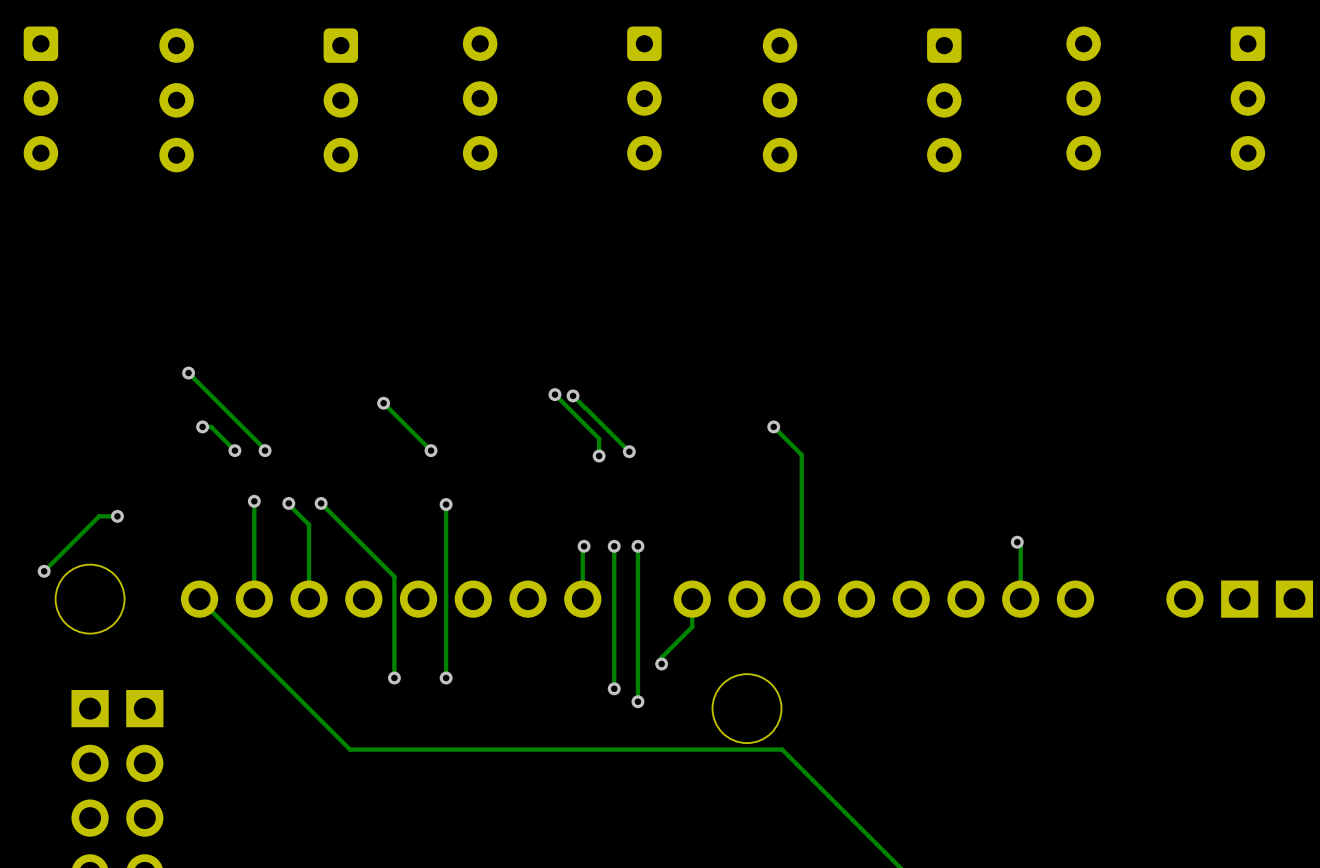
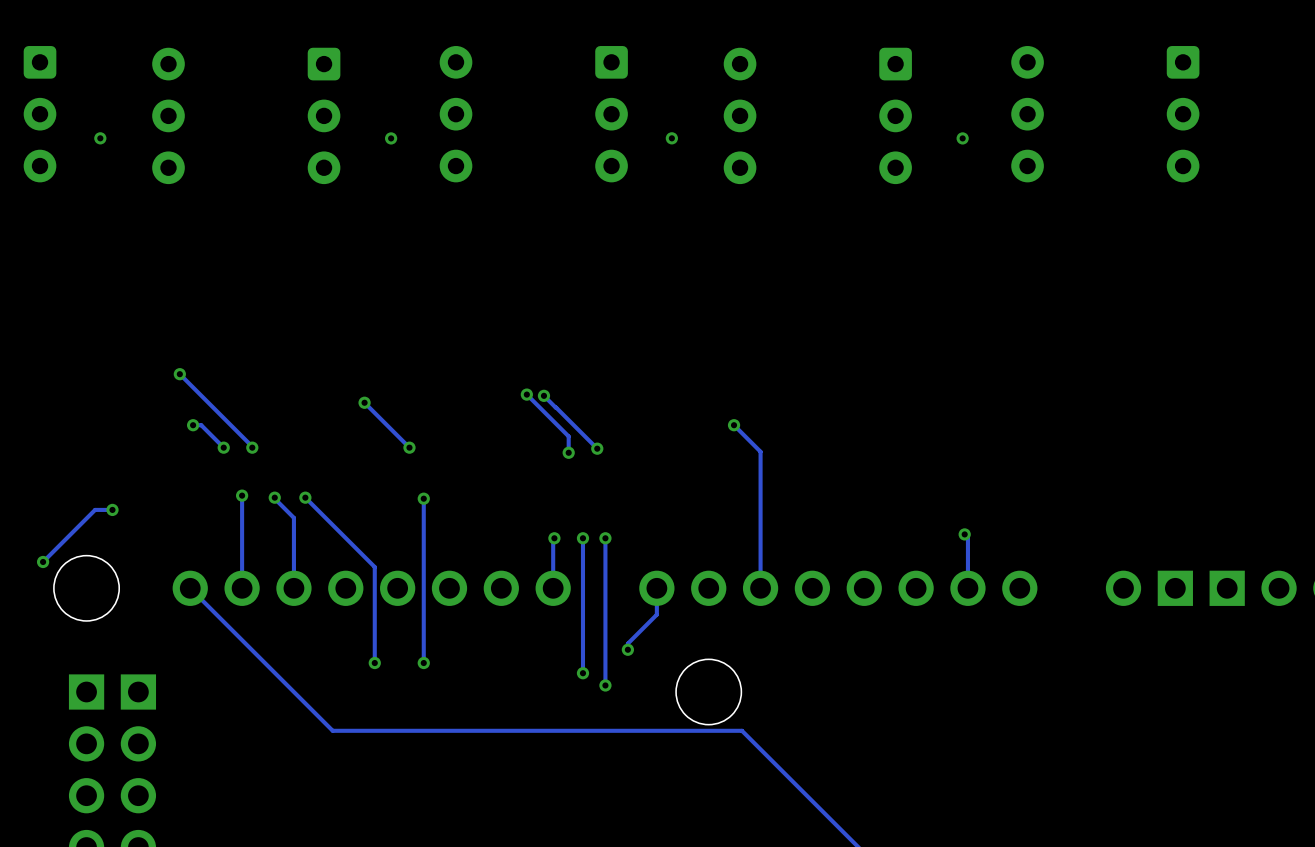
via: none -> (100, 138)
via: none -> (391, 138)
via: none -> (671, 138)
via: none -> (962, 138)

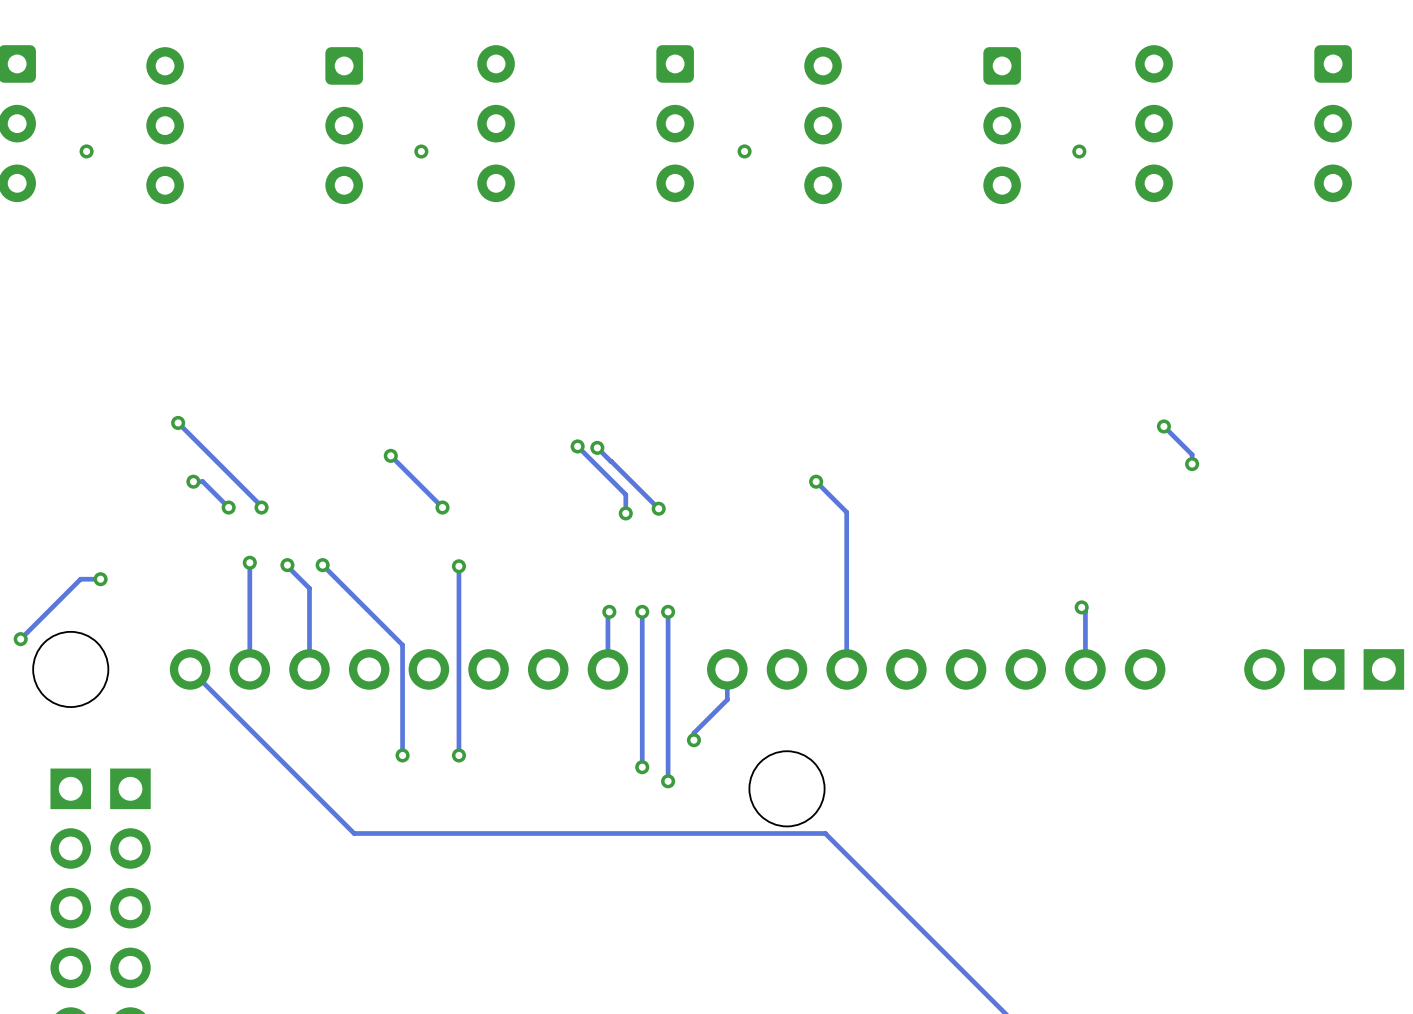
track: none -> (1163, 426) (1192, 454) (1192, 464)
via: none -> (1163, 426)
via: none -> (1192, 464)

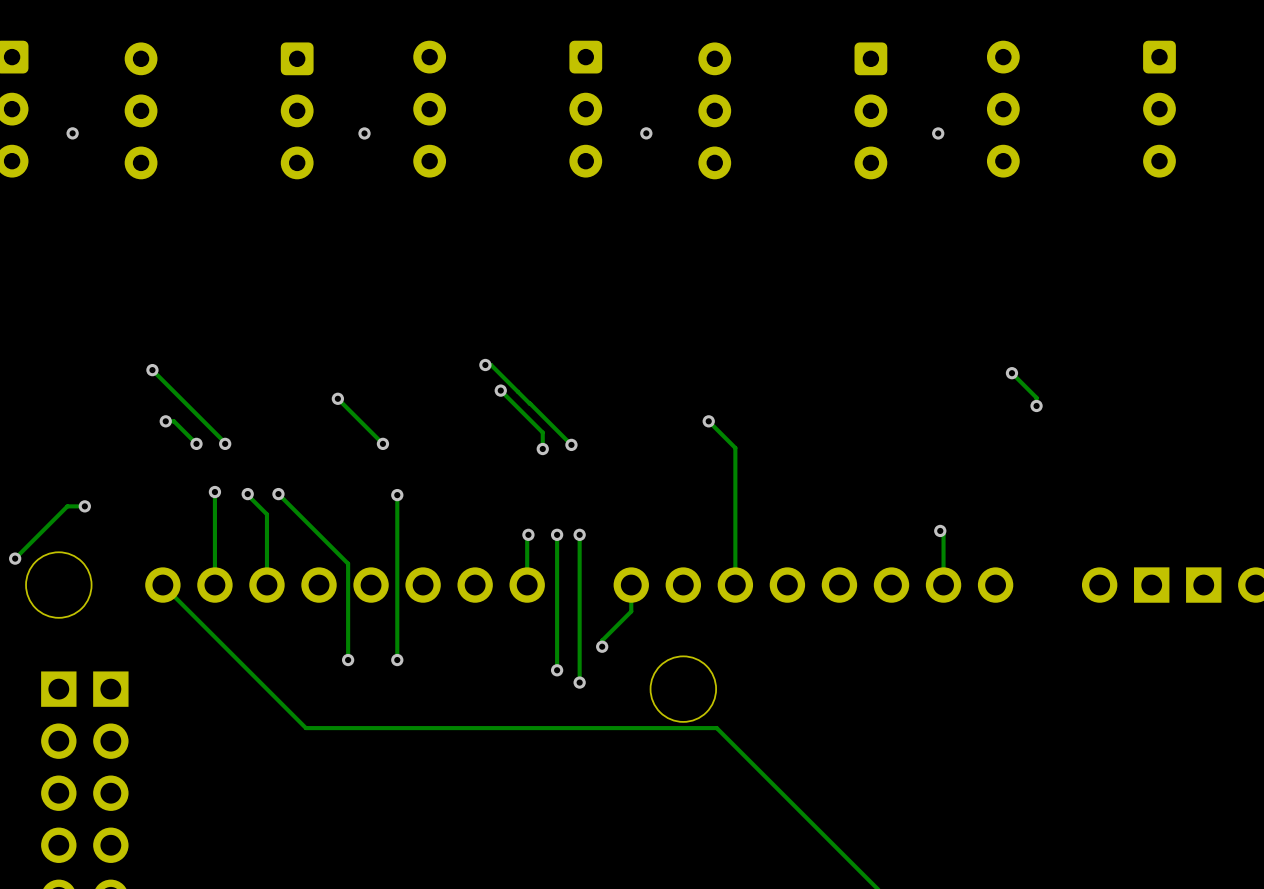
track: none -> (485, 364) (491, 364) (517, 391)
via position: (597, 447) -> (485, 364)

